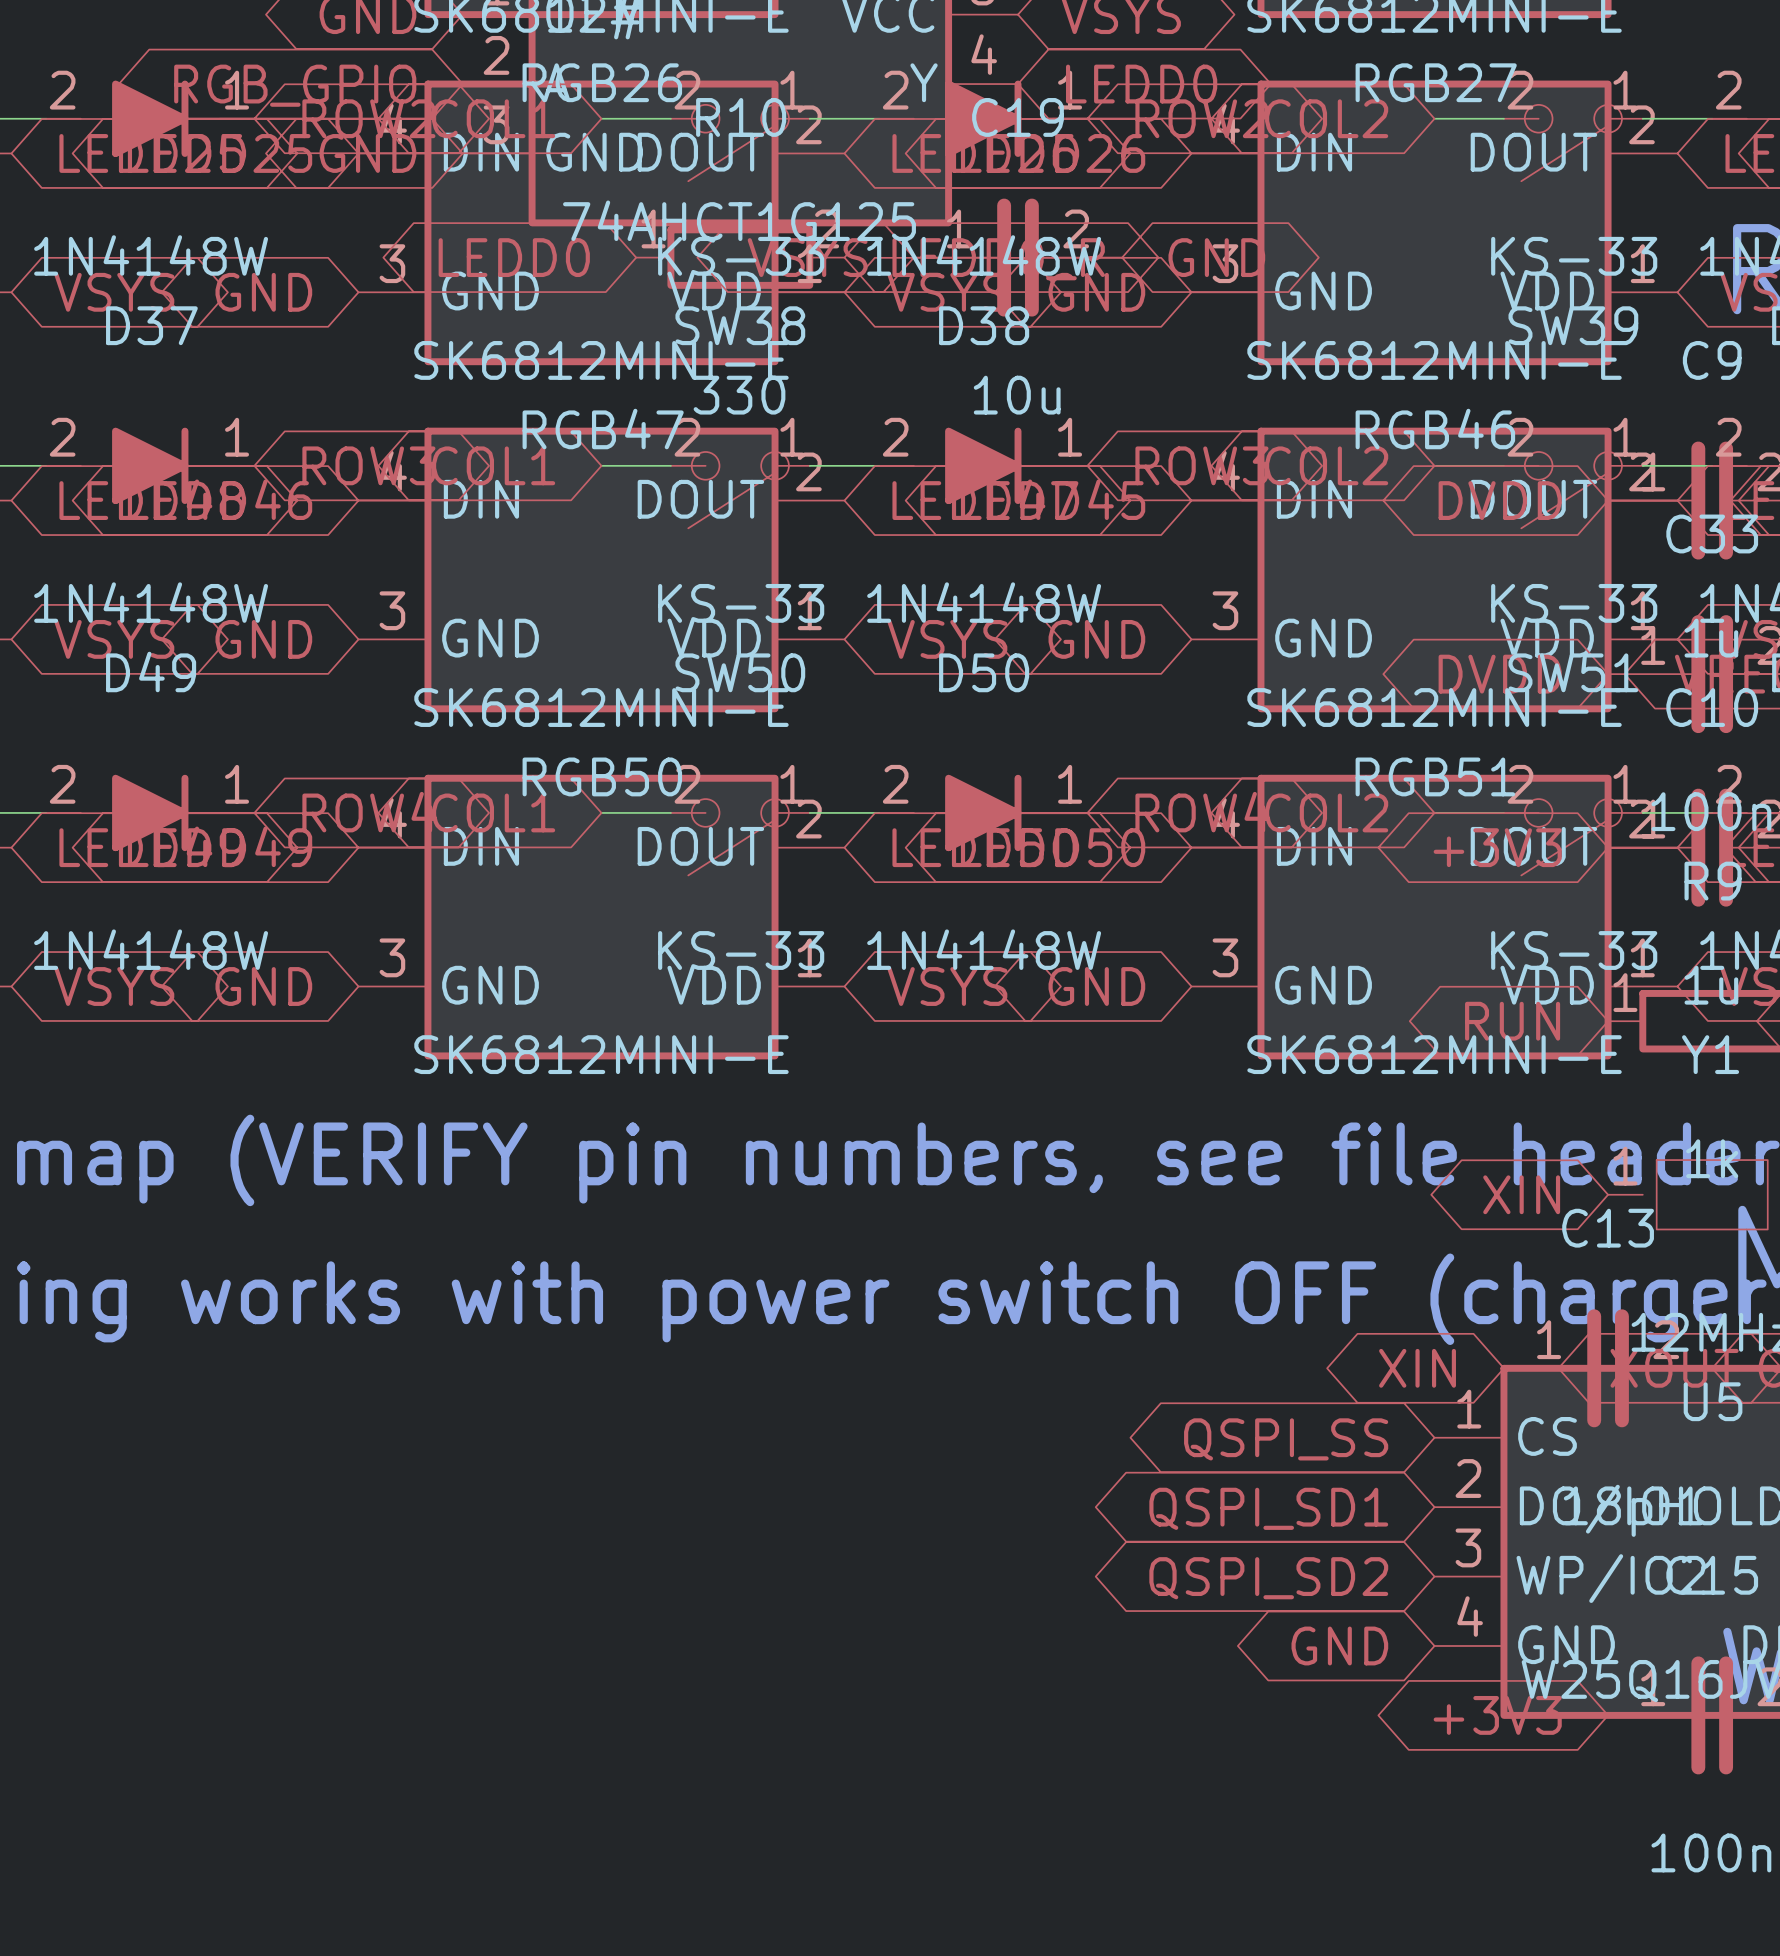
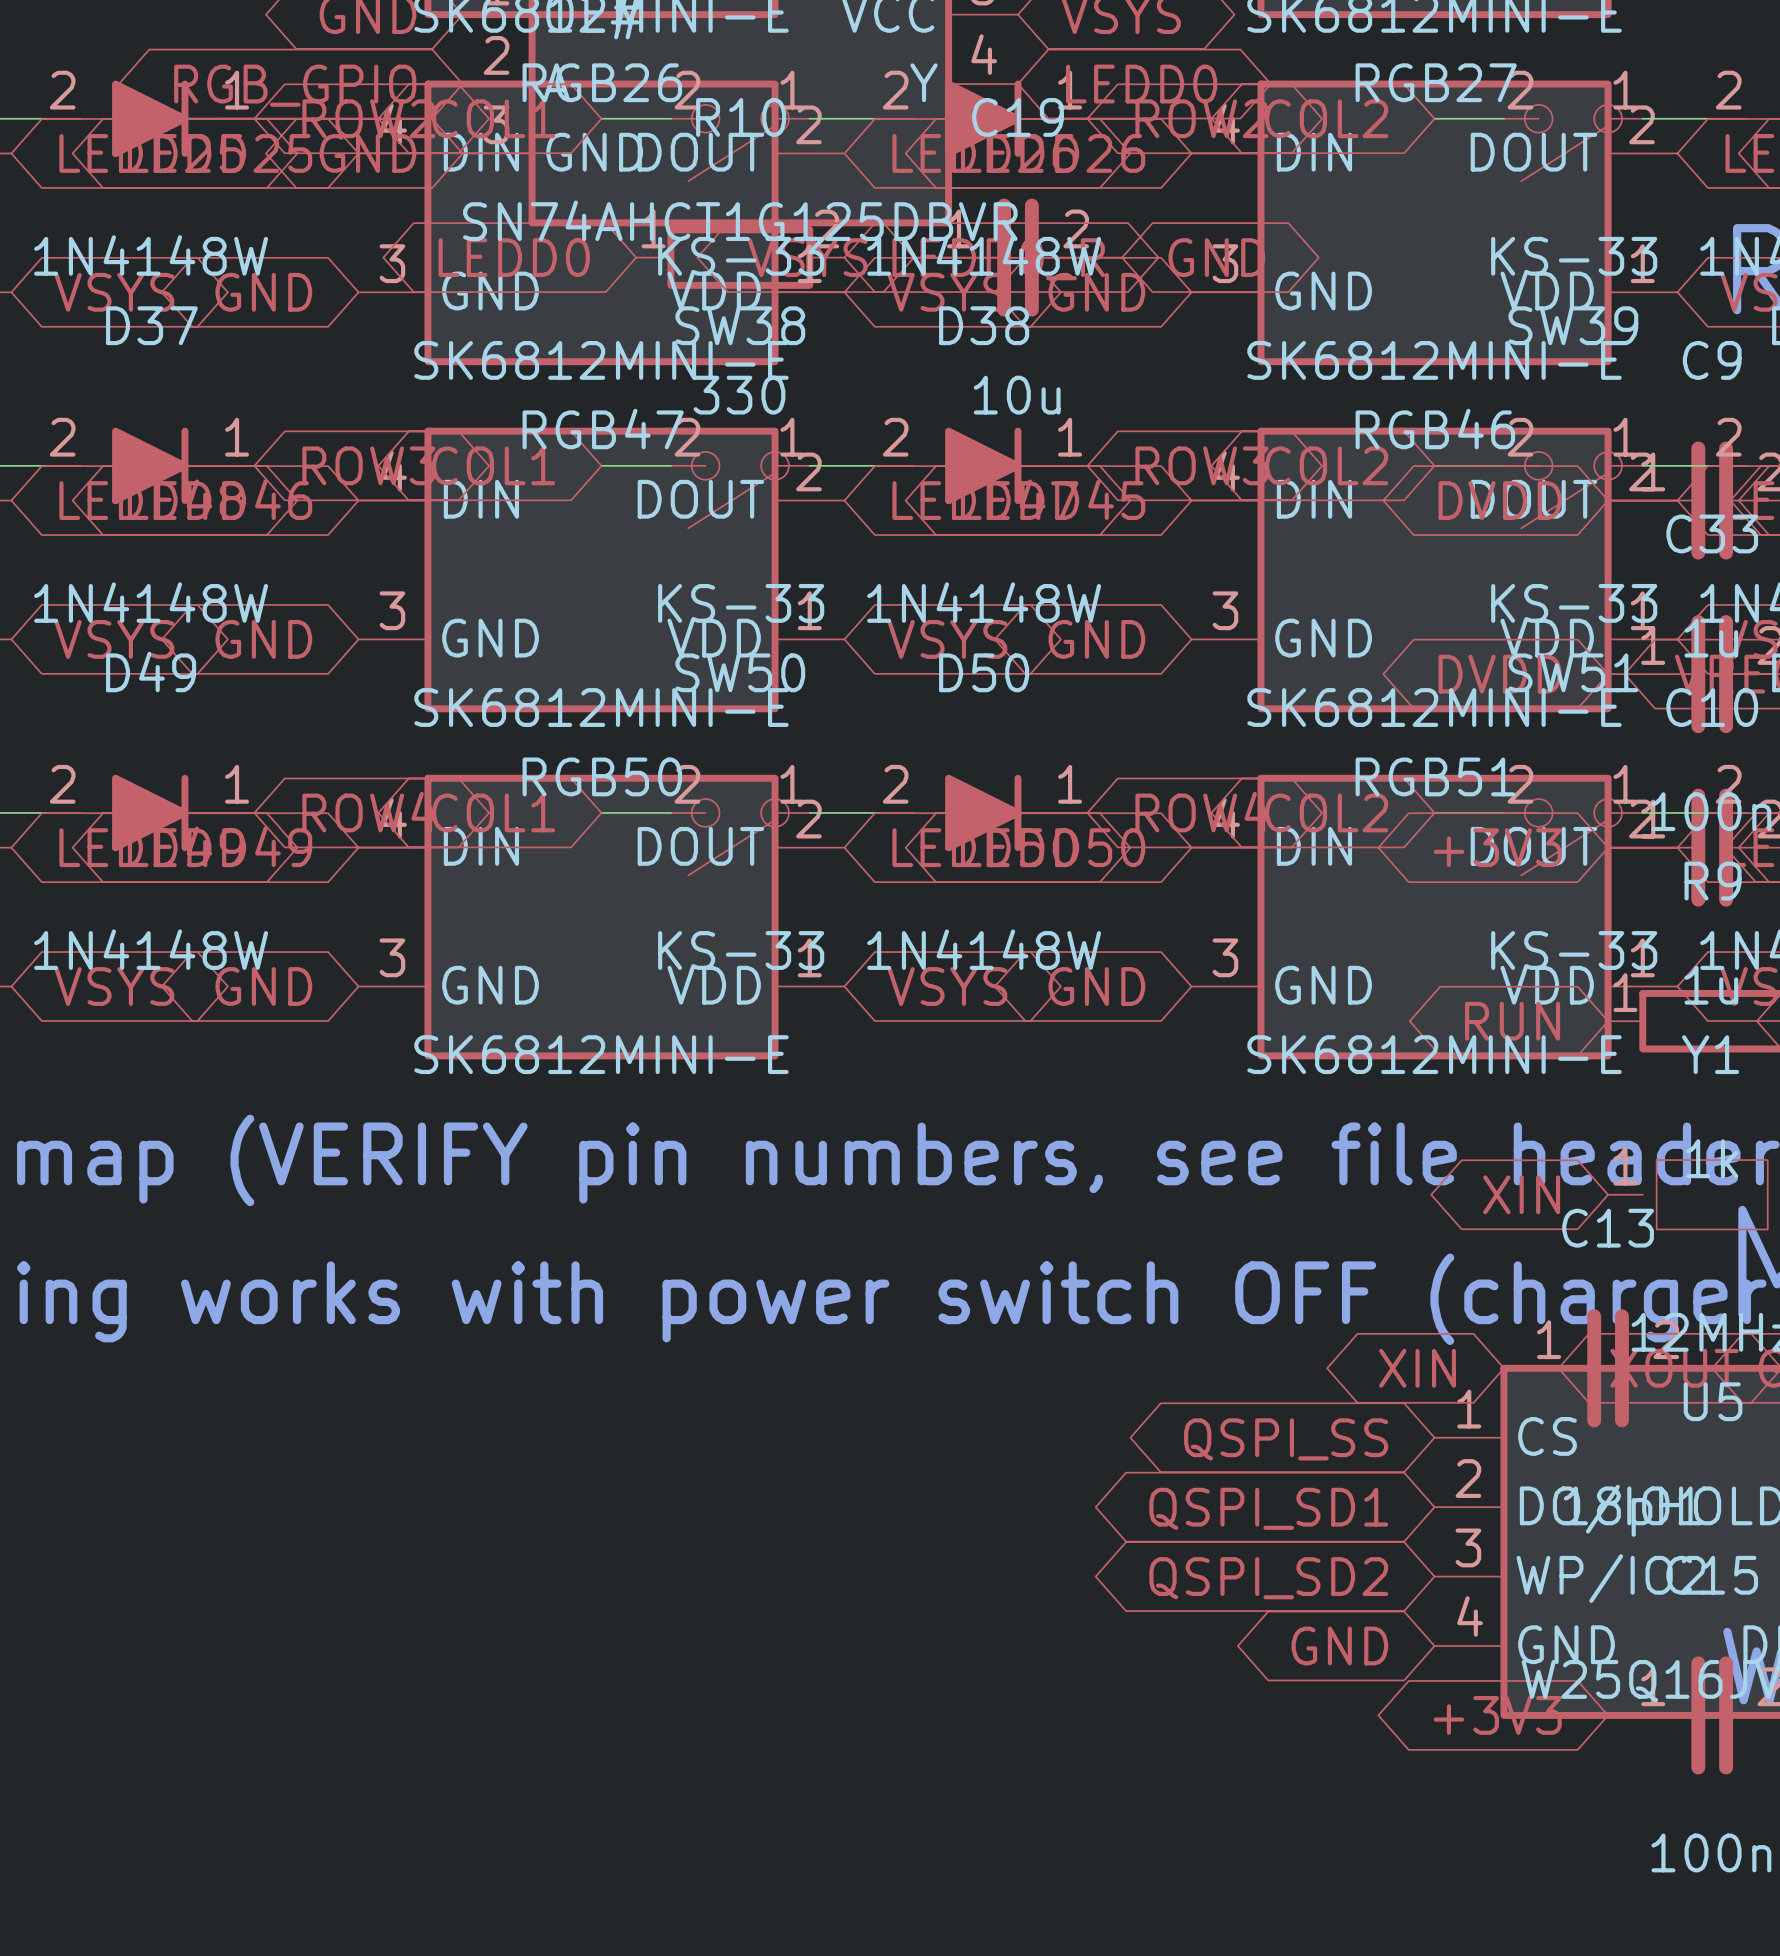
part value: 74AHCT1G125 (739, 220) -> SN74AHCT1G125DBVR (740, 220)

